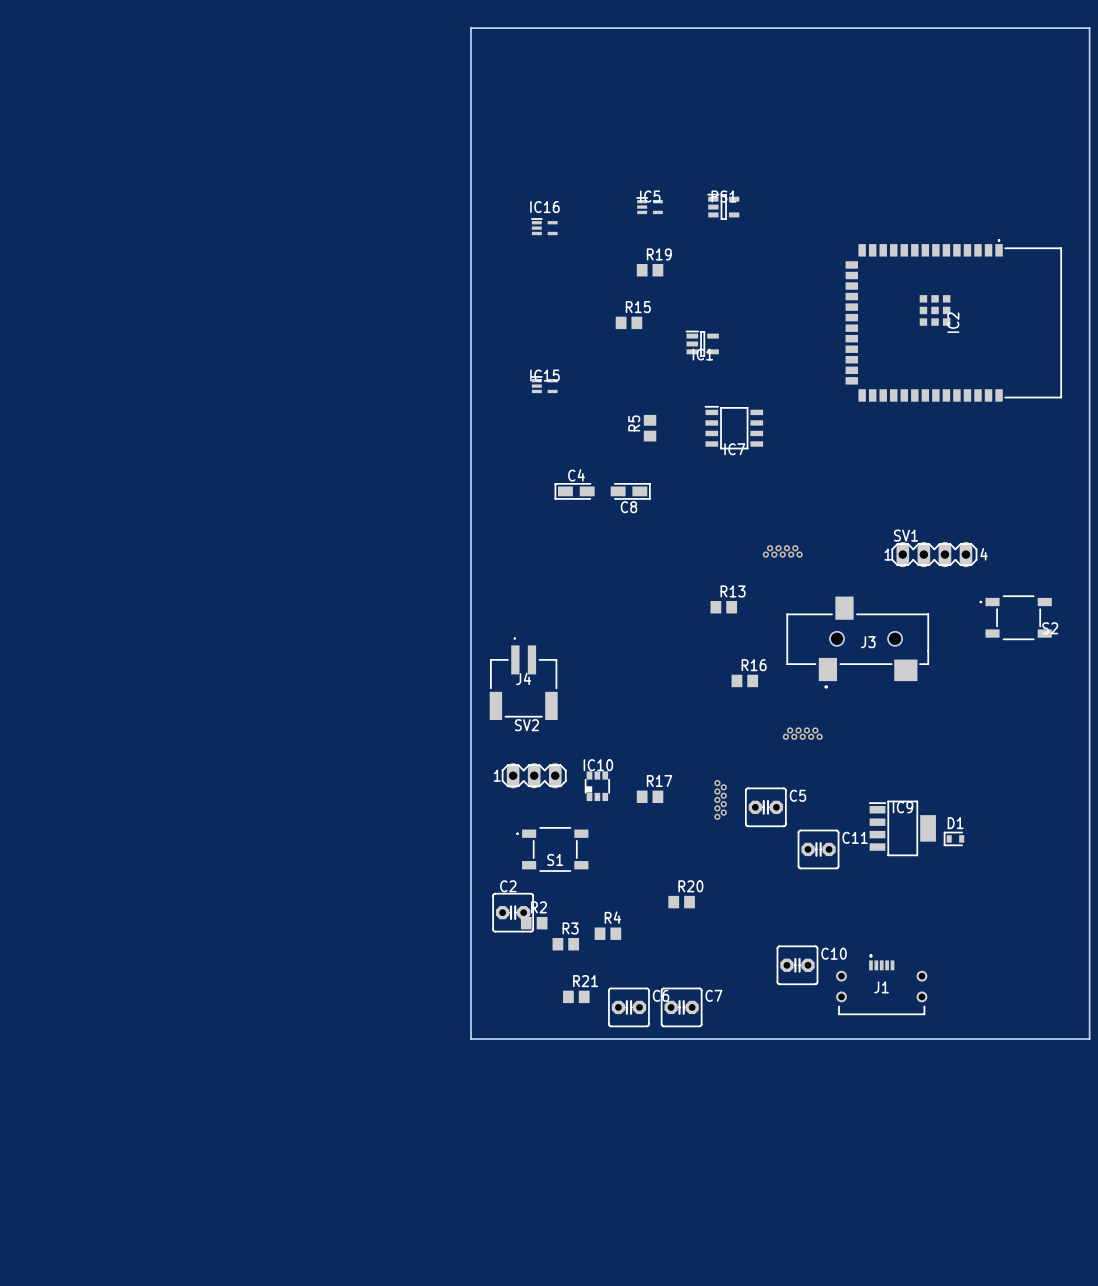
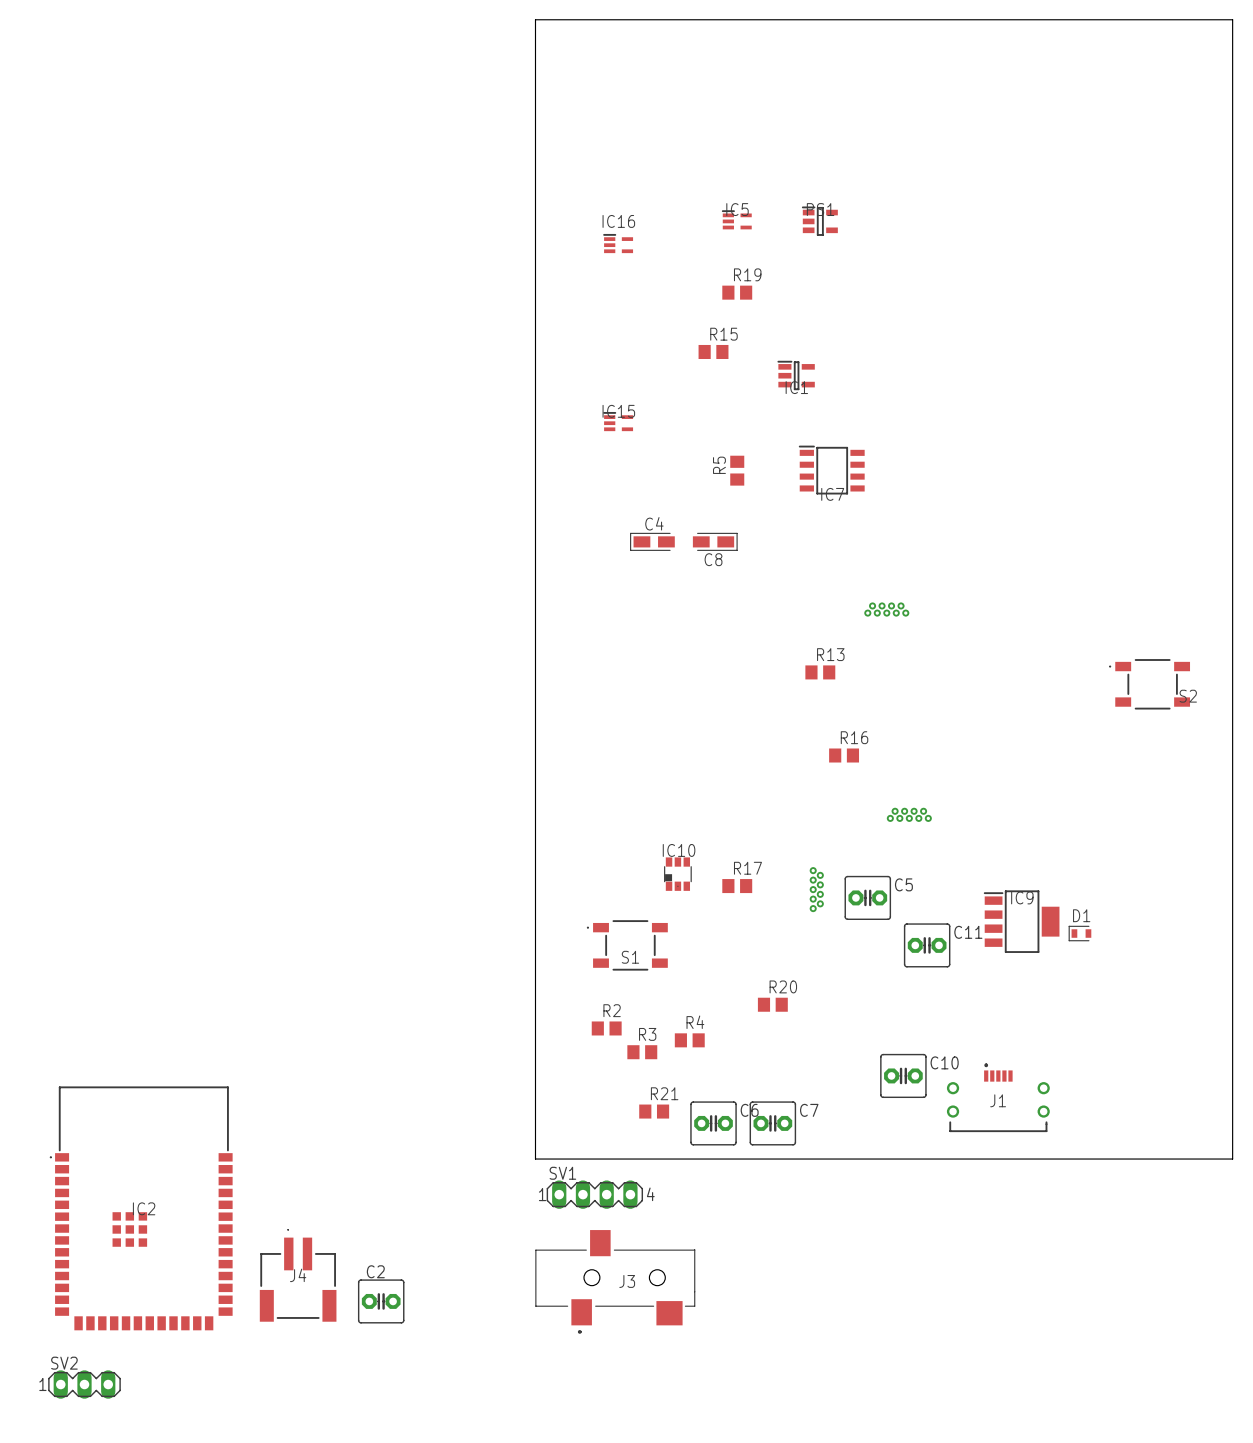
IC2 rotation: 0° (953, 320) -> 90° counterclockwise (141, 1208)
IC2 position: (953, 320) -> (141, 1208)
SV1 position: (934, 554) -> (594, 1194)
J3 position: (857, 642) -> (615, 1281)
J4 position: (523, 679) -> (298, 1275)
SV2 name position: SV2 (526, 725) -> SV2 (64, 1363)
SV2 position: (534, 775) -> (84, 1384)
C2 position: (513, 912) -> (381, 1301)

